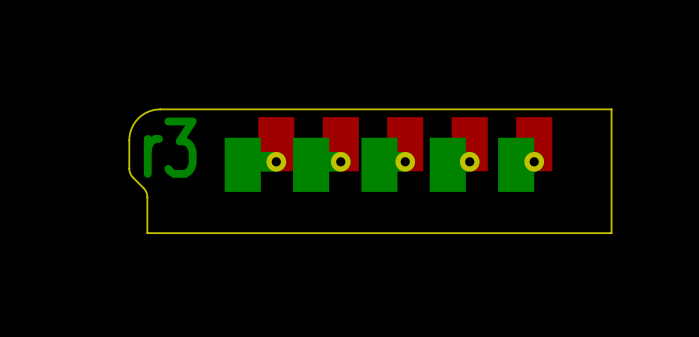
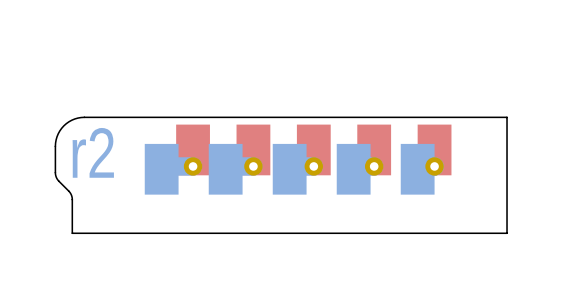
text: r3 (170, 147) -> r2 (93, 152)

